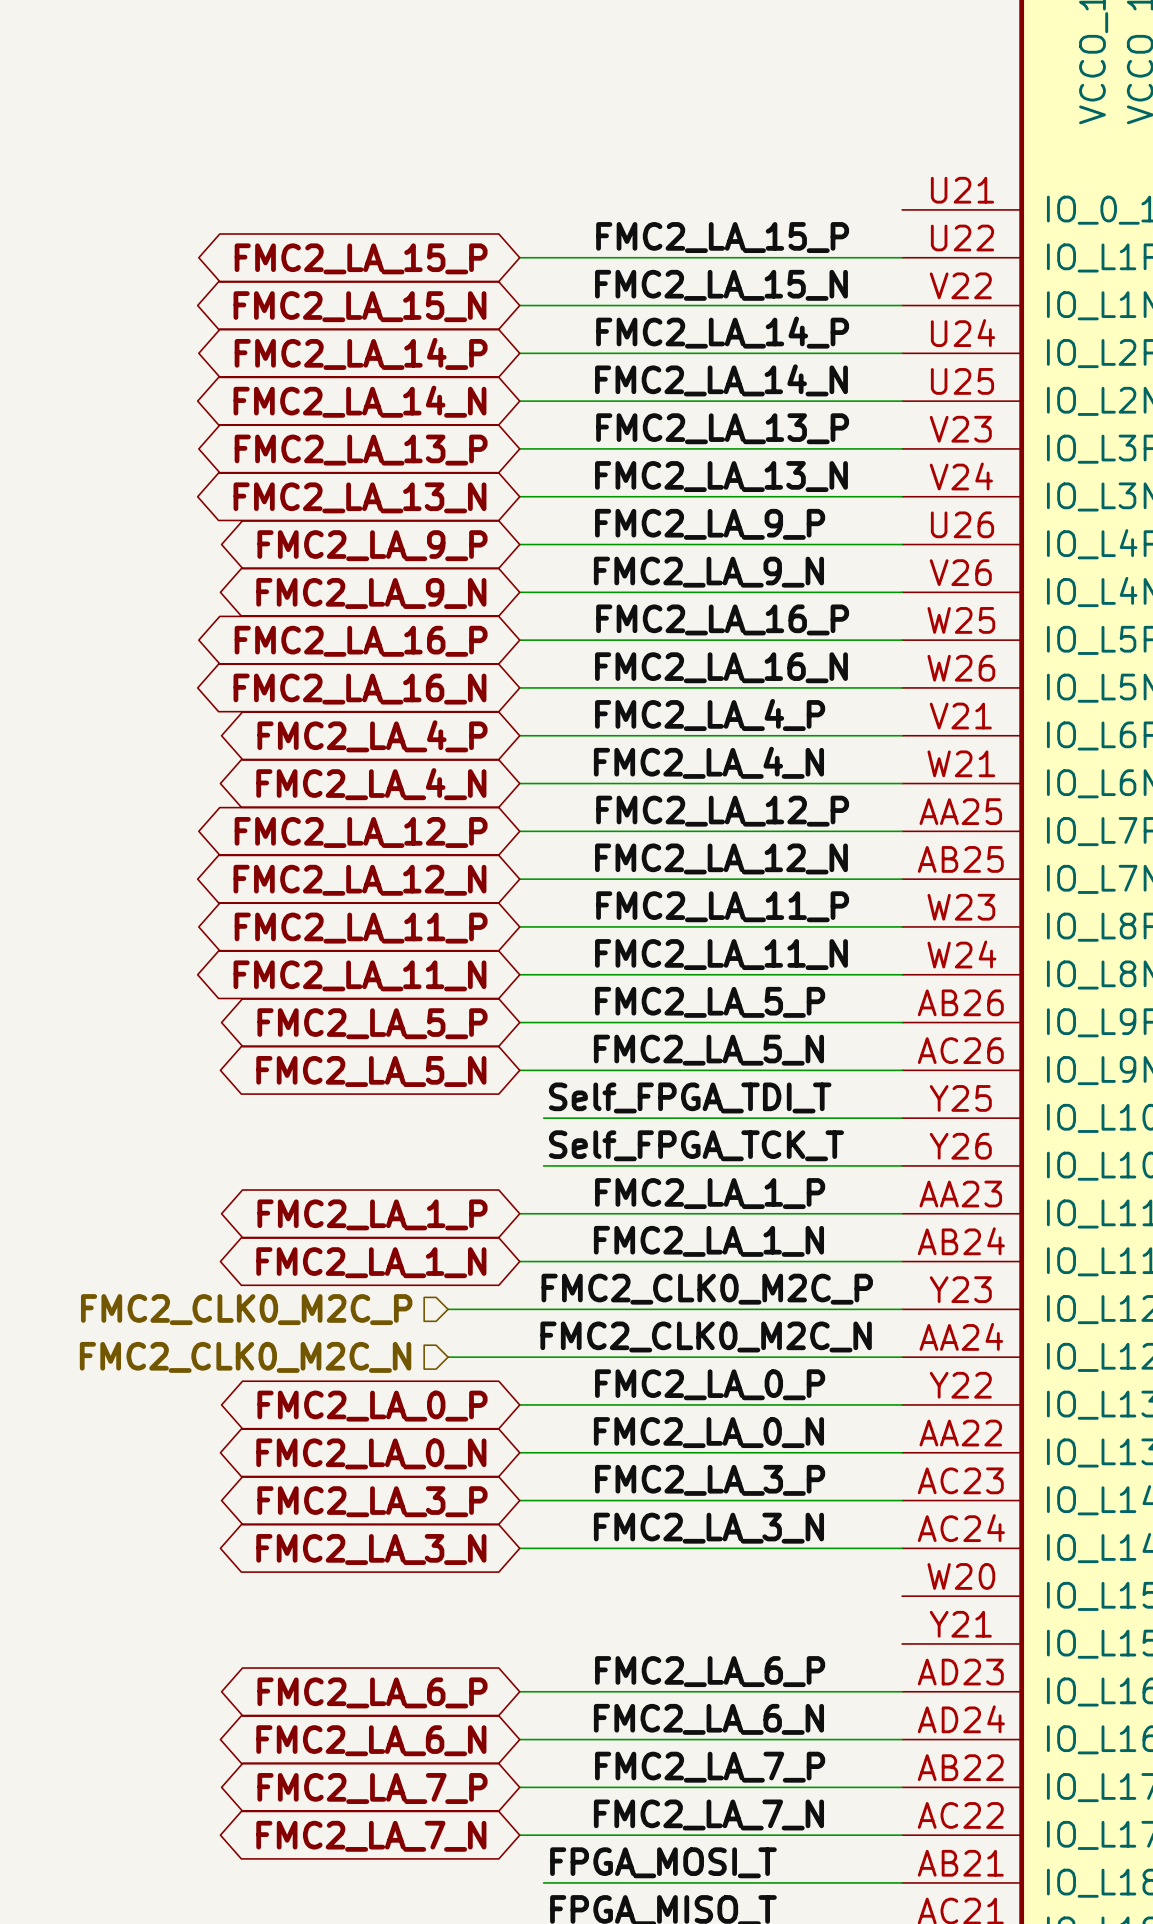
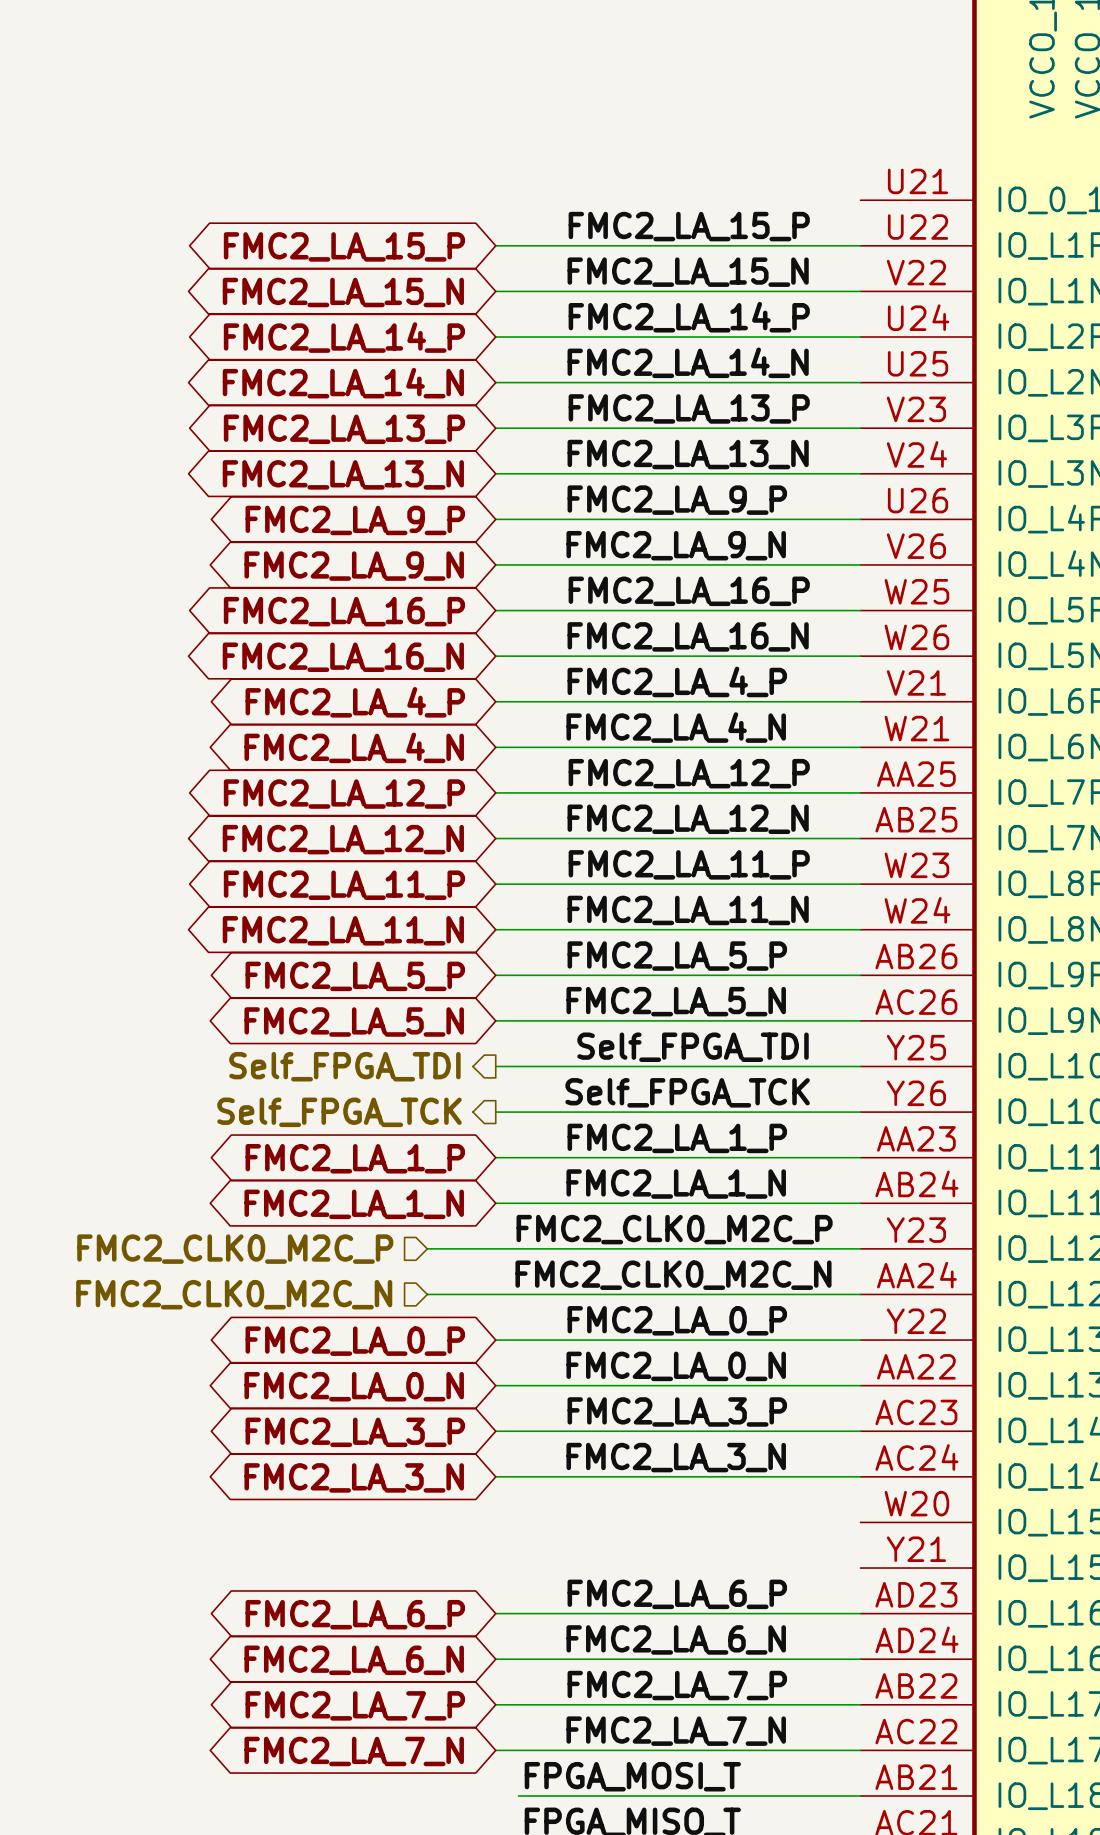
label: Self_FPGA_TDI_T (690, 1097) -> none
label: none -> Self_FPGA_TDI (693, 1047)
hierarchical label: none -> Self_FPGA_TDI (344, 1066)
wire: none -> (495, 1066) (518, 1066)
label: Self_FPGA_TCK_T (696, 1145) -> none
label: none -> Self_FPGA_TCK (687, 1092)
wire: none -> (495, 1112) (518, 1112)
hierarchical label: none -> Self_FPGA_TCK (339, 1112)

